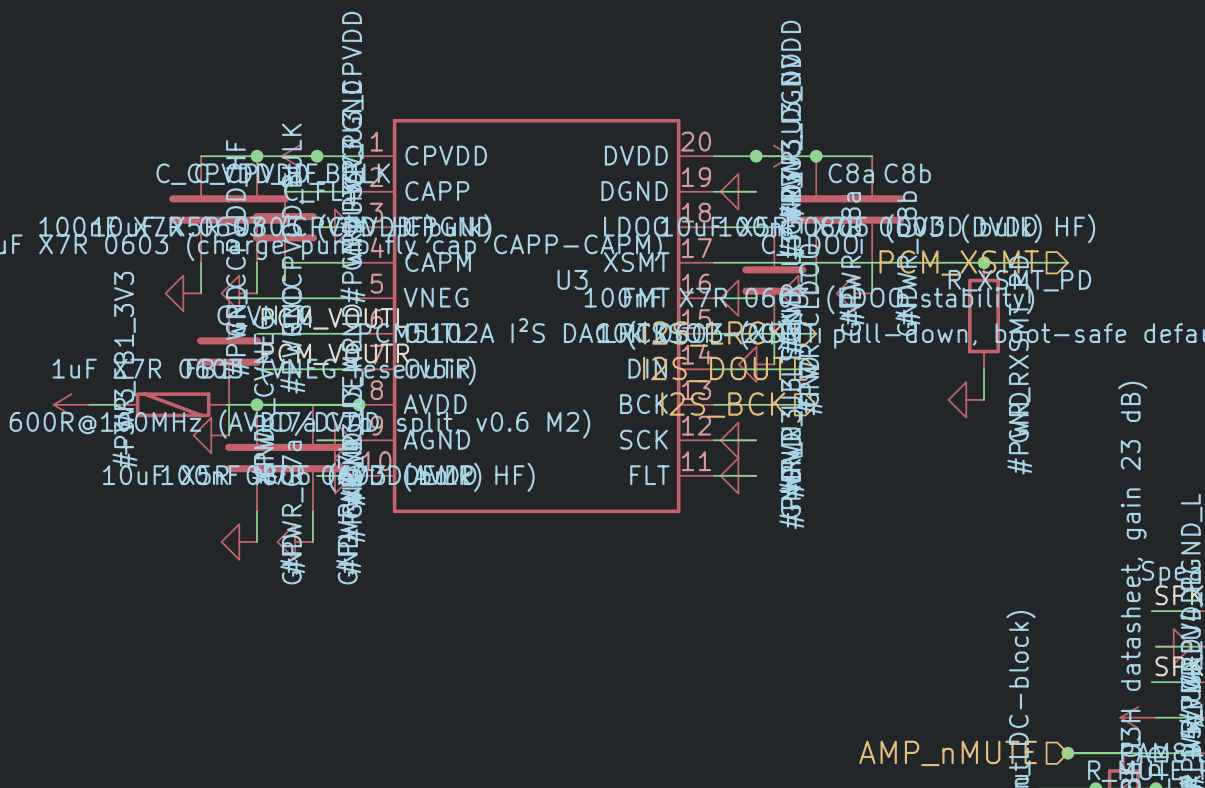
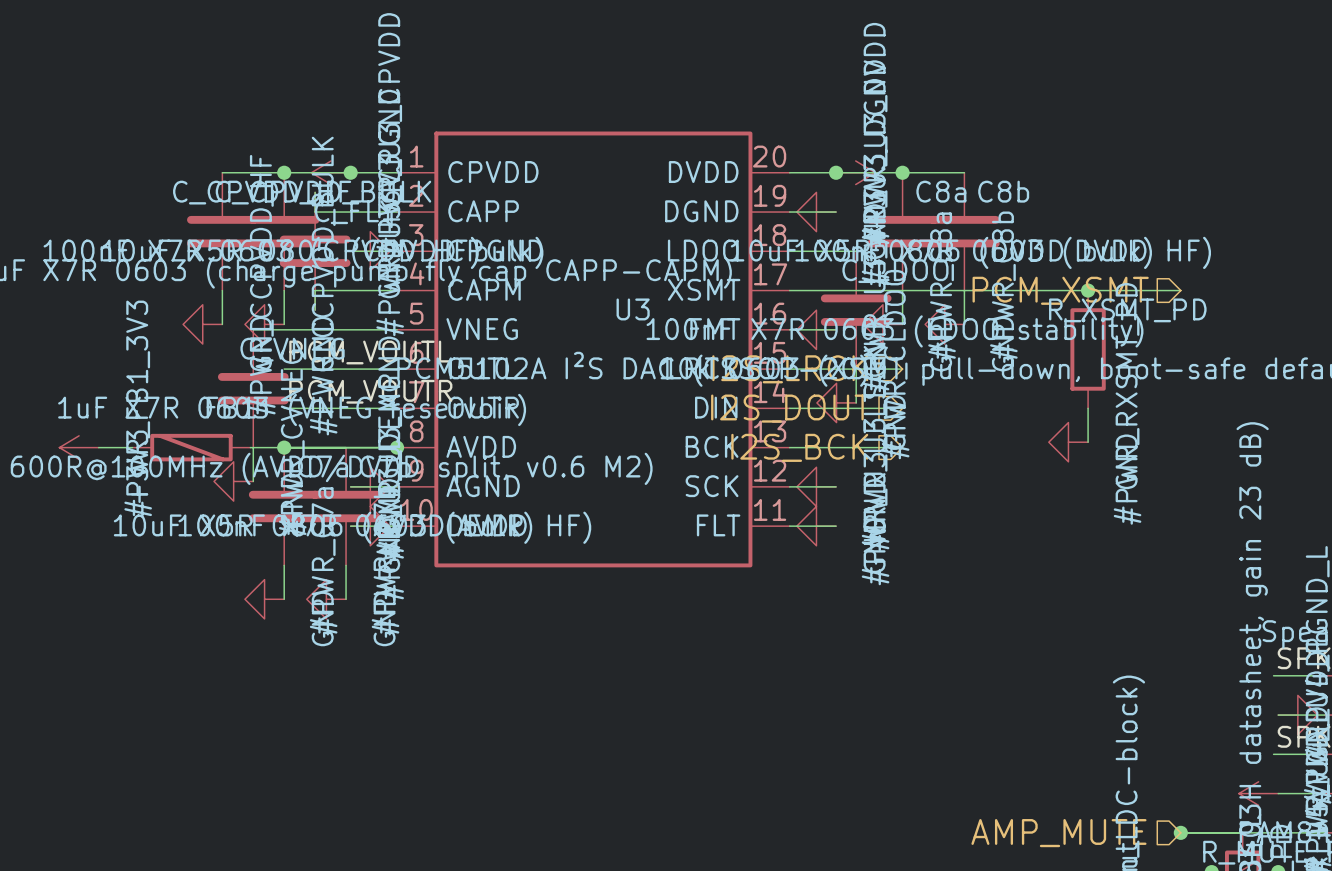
hierarchical label: AMP_nMUTE (948, 753) -> AMP_MUTE (1058, 833)

